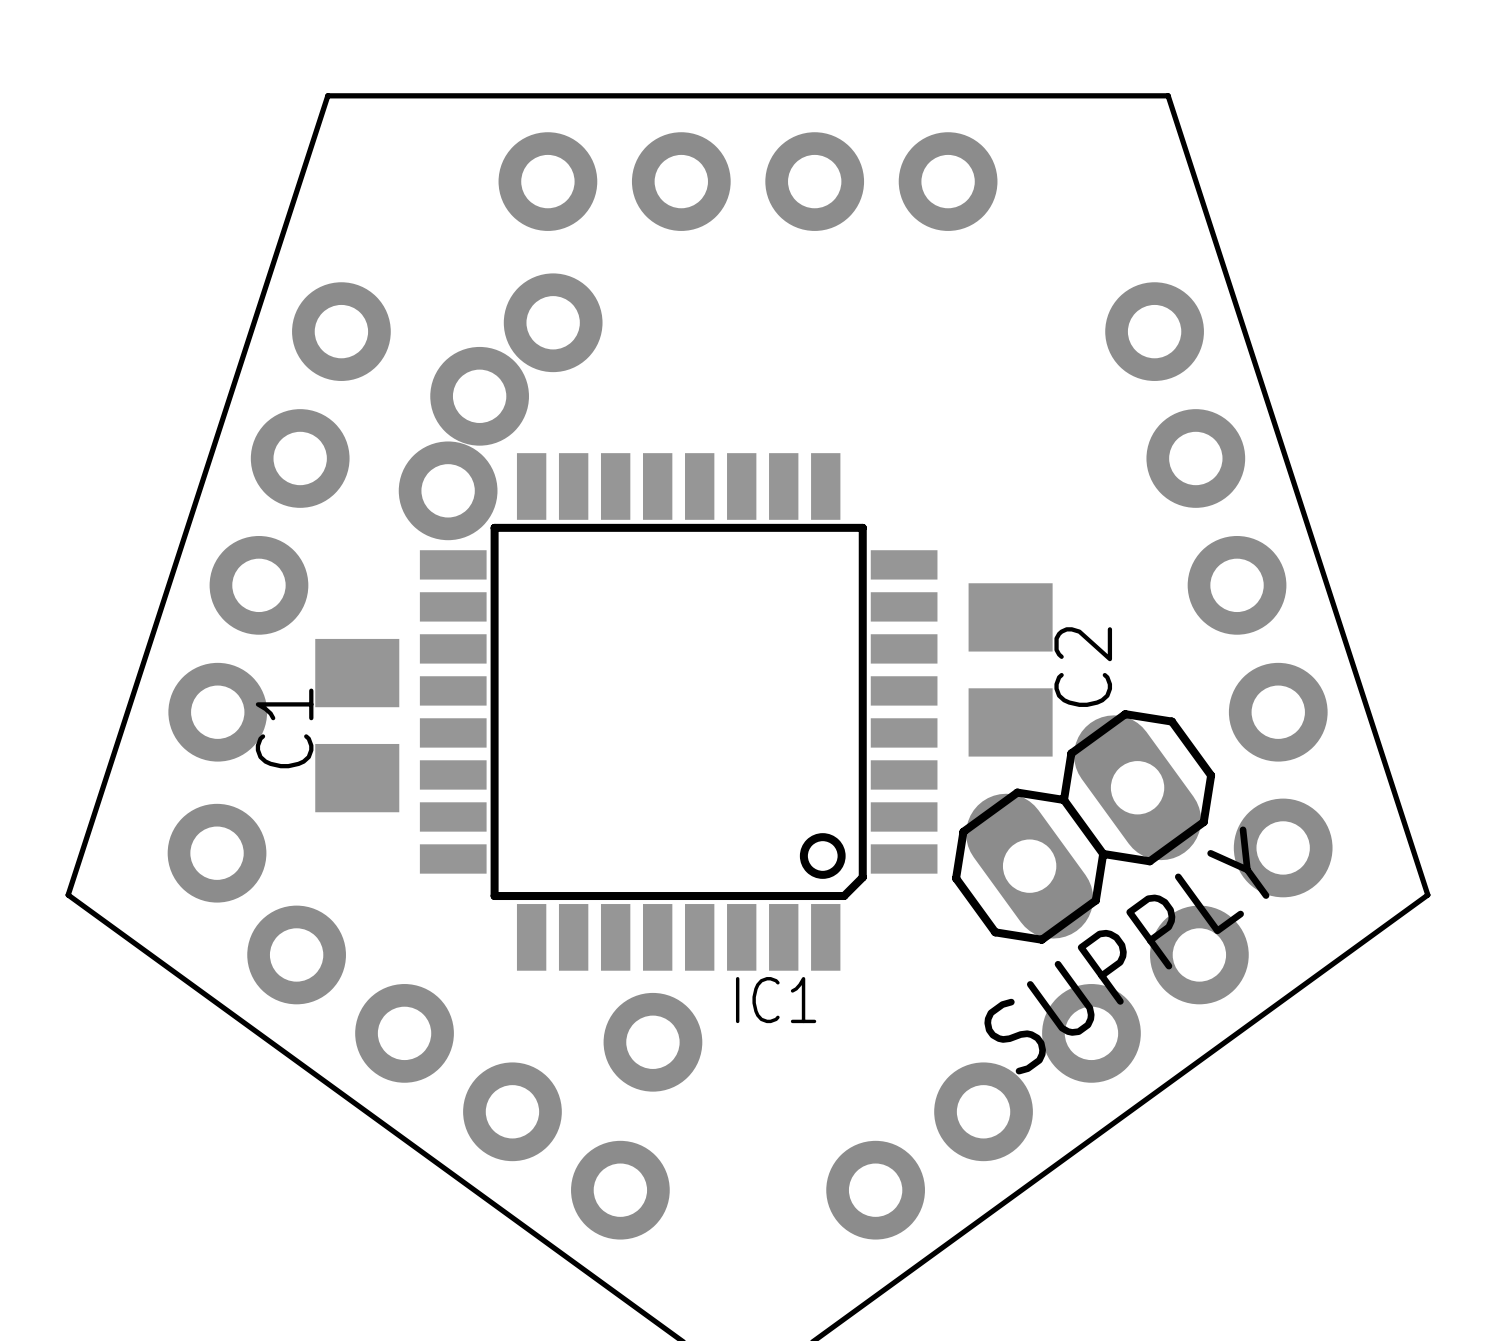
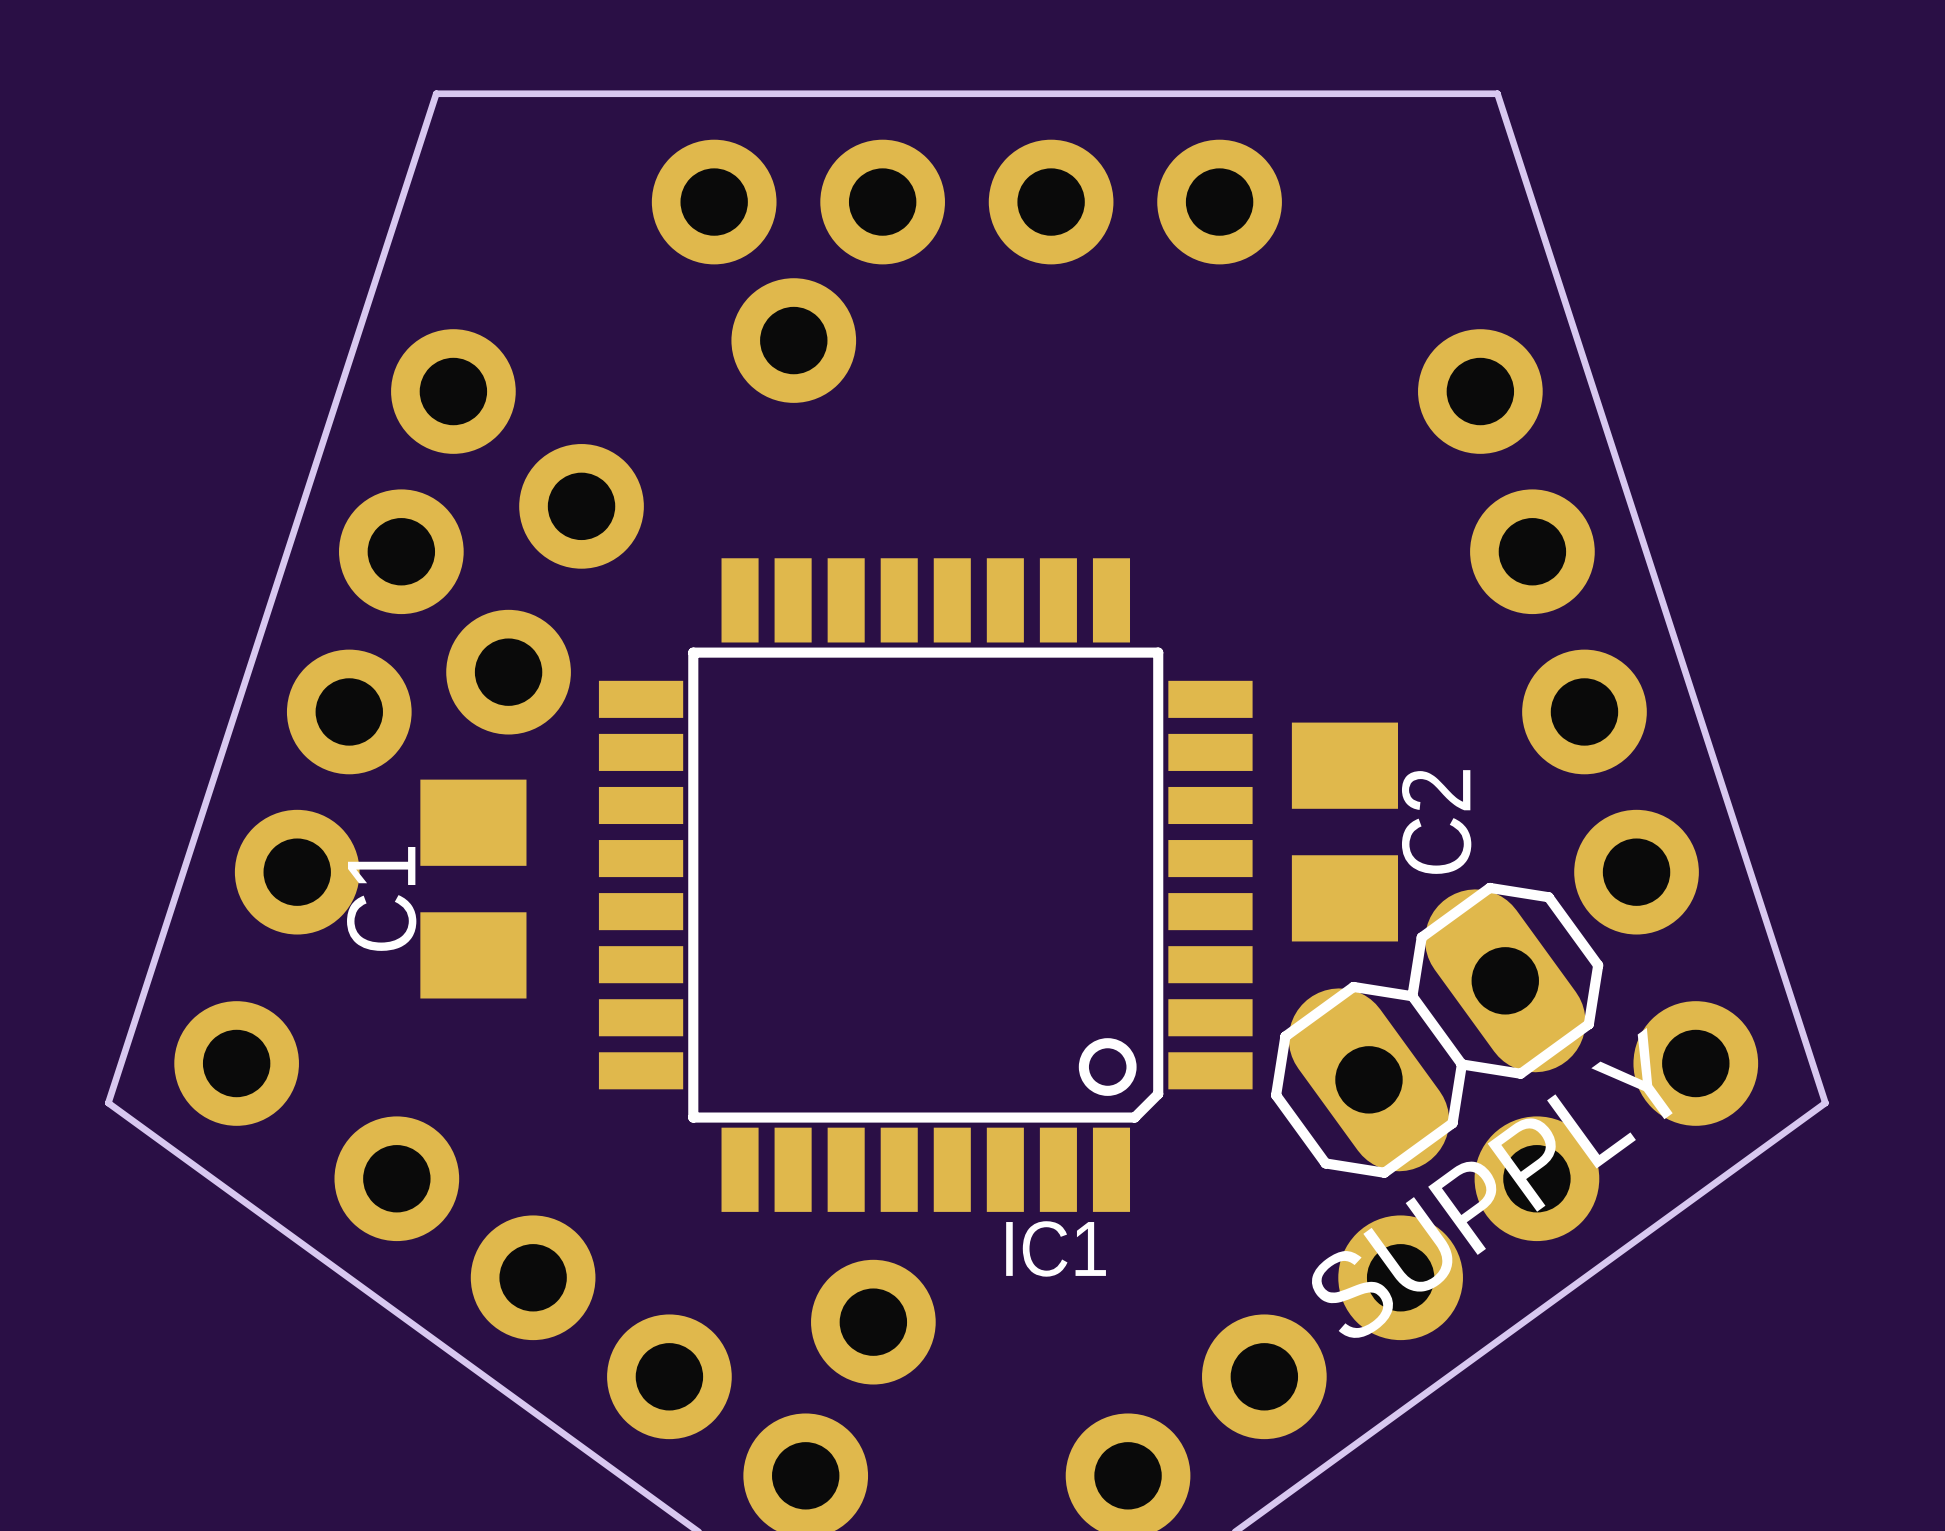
part position: (553, 322) -> (793, 340)
part: (479, 396) -> none
part: none -> (581, 506)
part: (448, 490) -> none
part: none -> (508, 672)
C2 position: (1010, 669) -> (1344, 832)
IC1 position: (678, 711) -> (925, 885)
SUPPLY position: (1083, 826) -> (1437, 1030)
part position: (1283, 847) -> (1695, 1063)
part position: (217, 853) -> (236, 1063)
part position: (652, 1042) -> (873, 1322)

